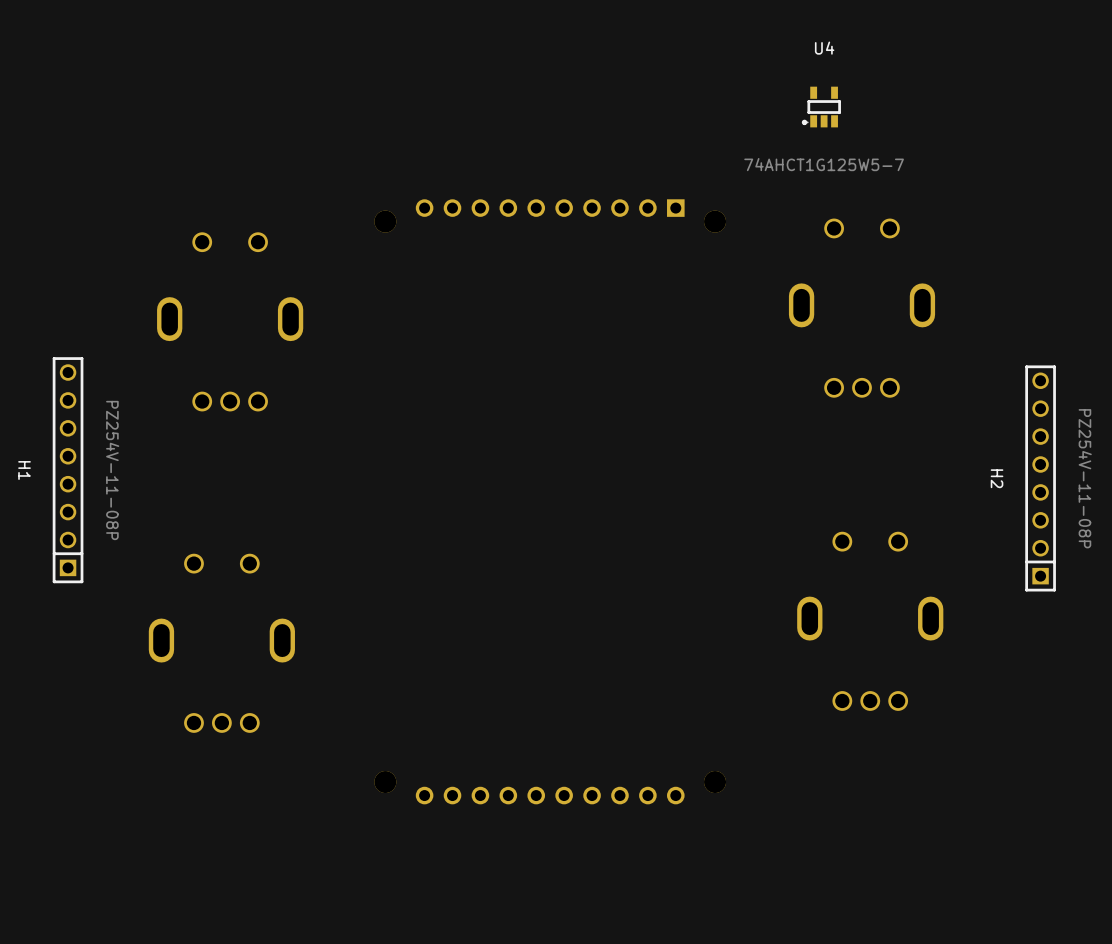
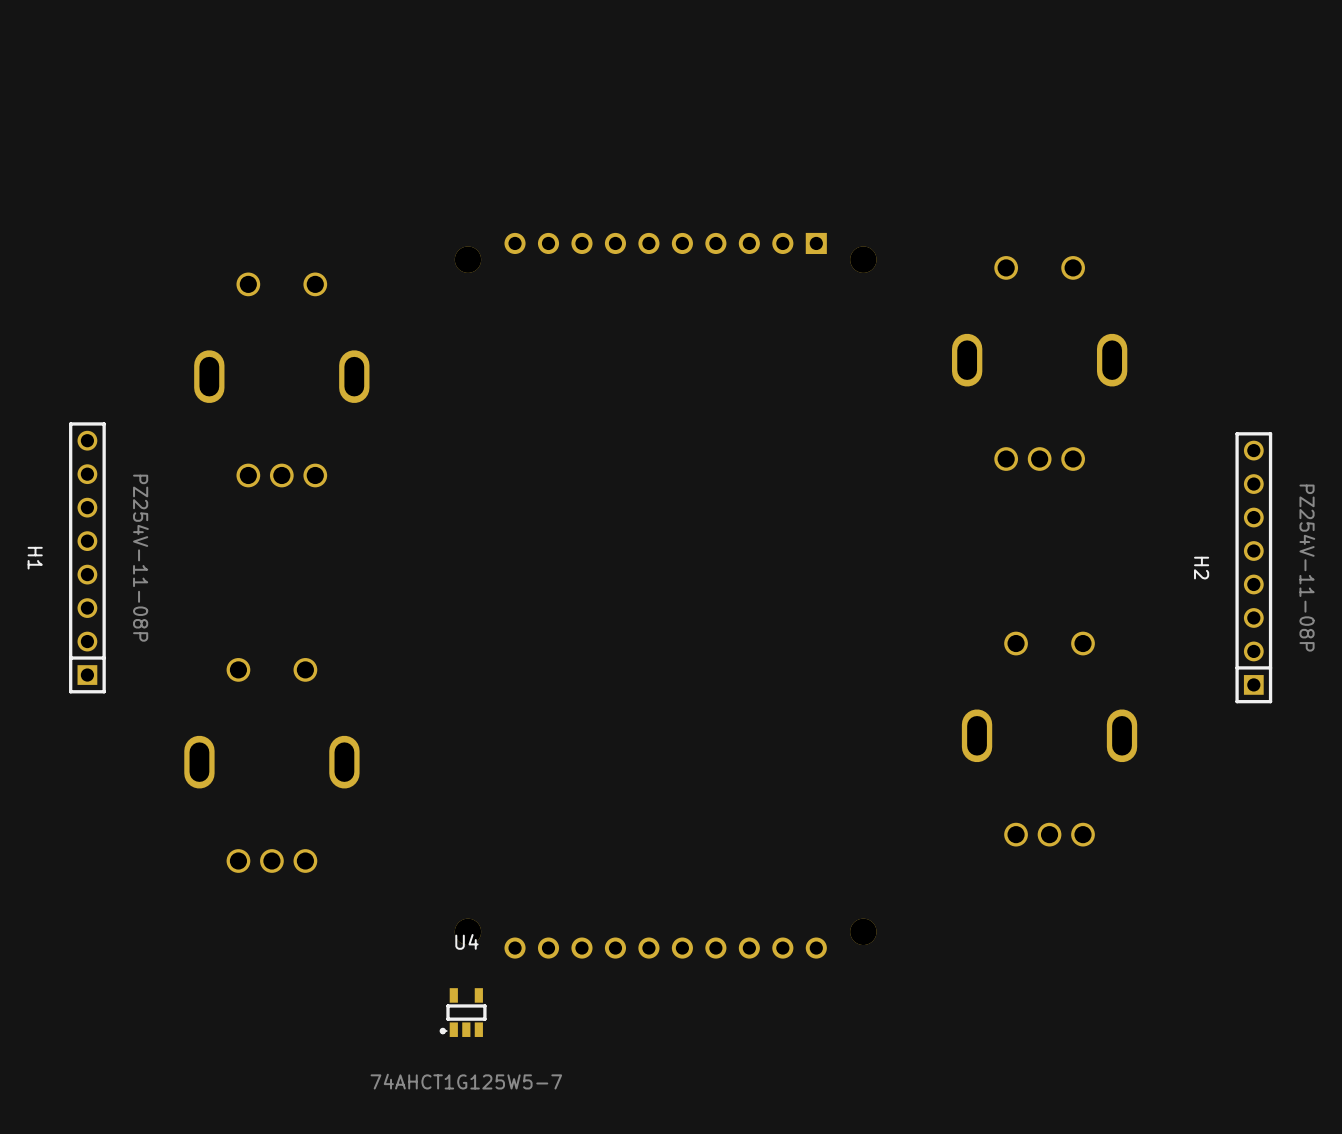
U4 position: (821, 107) -> (463, 1012)

